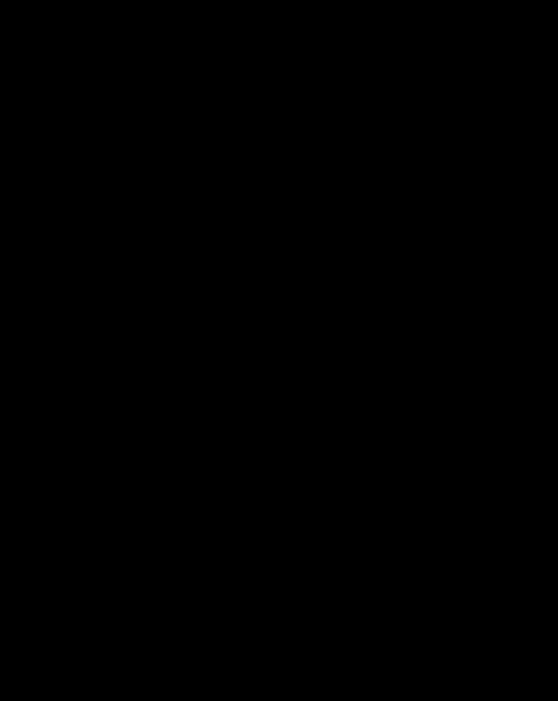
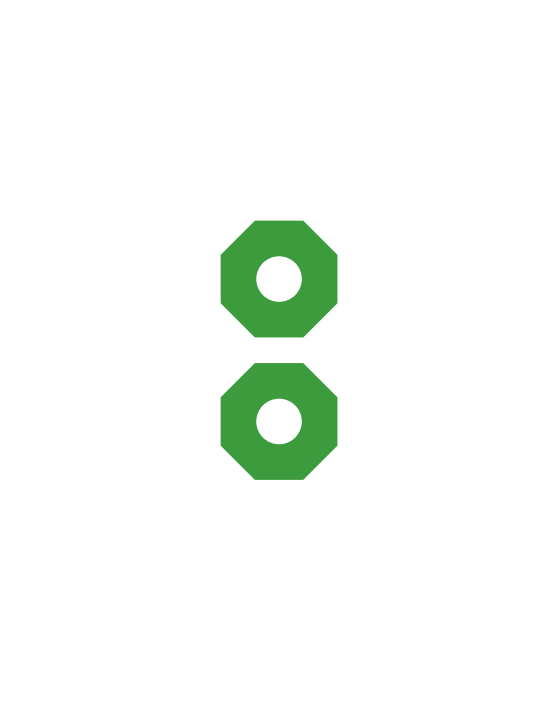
part: none -> (279, 350)

